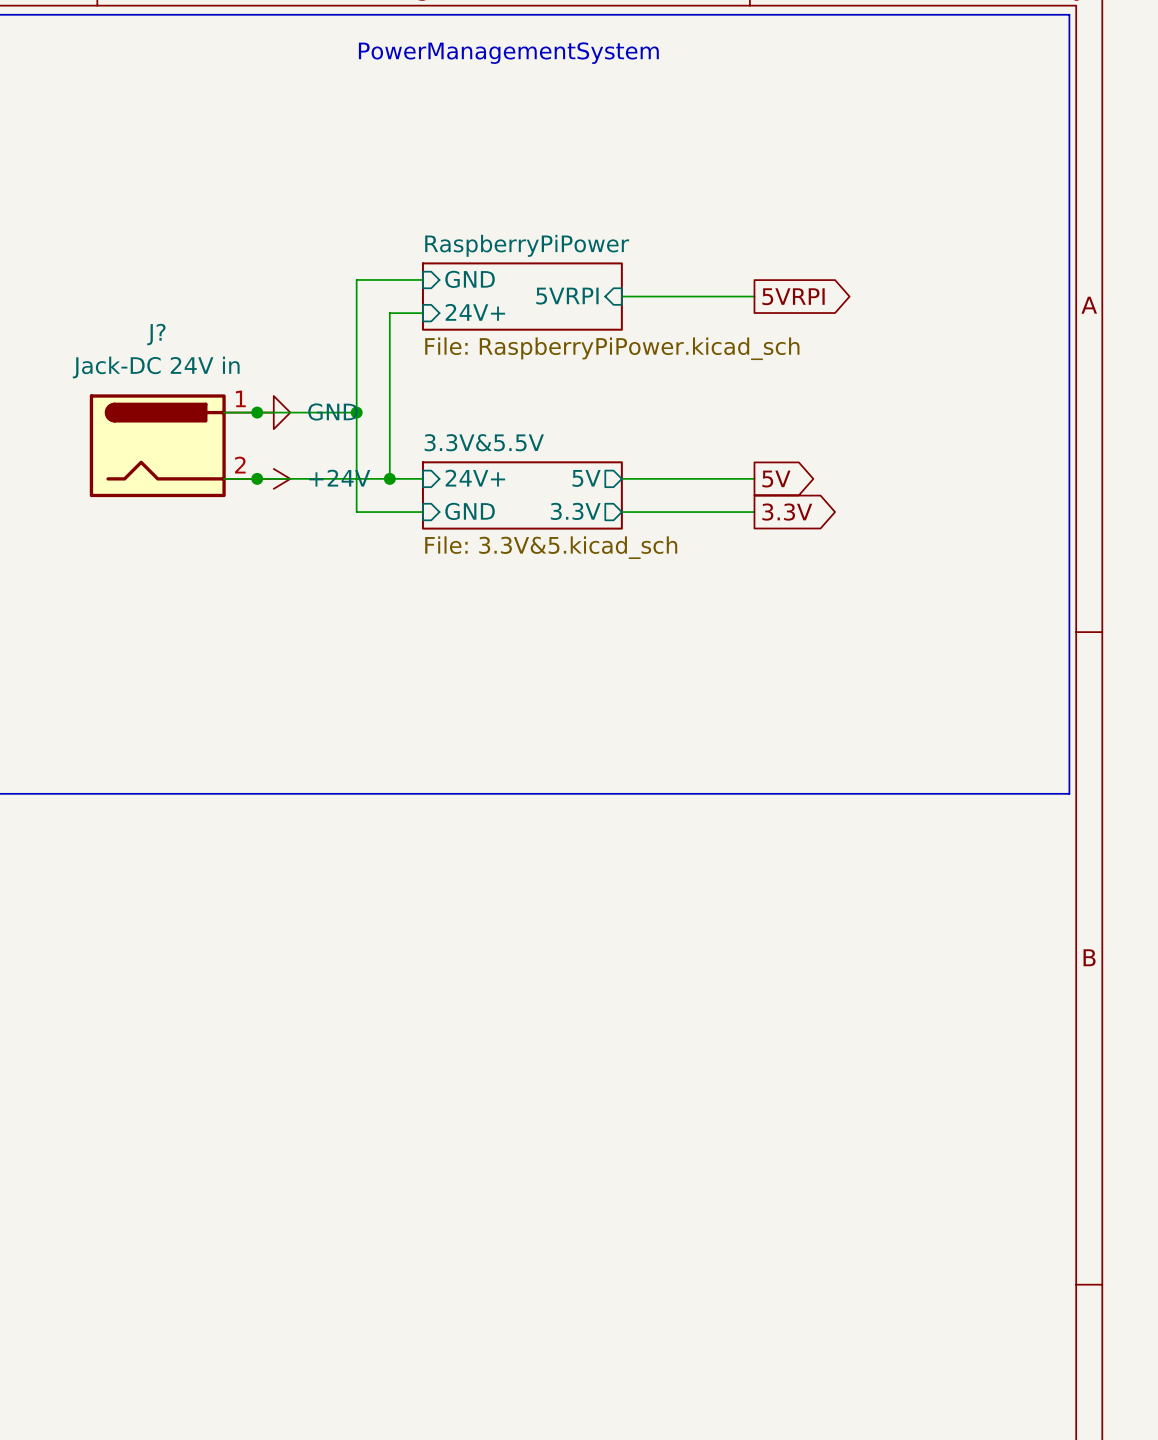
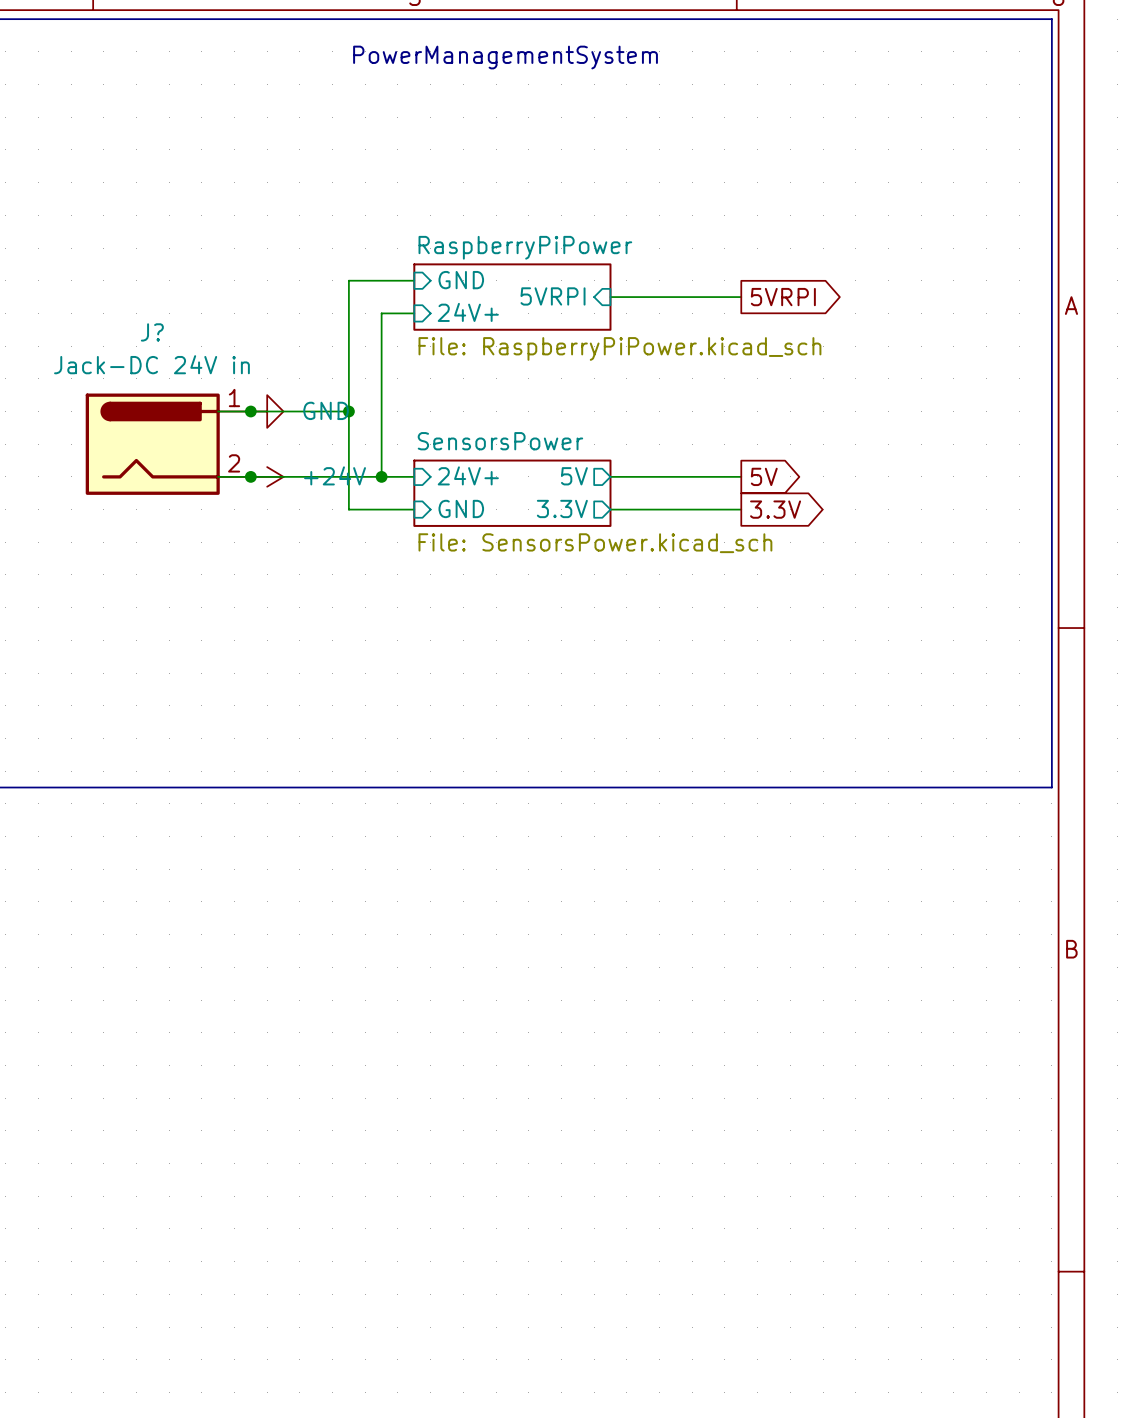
sheet 3.3V&5.5V name: 3.3V&5.5V (484, 442) -> SensorsPower (500, 441)
sheet 3.3V&5.5V value: File: 3.3V&5.kicad_sch (551, 547) -> File: SensorsPower.kicad_sch (595, 543)

